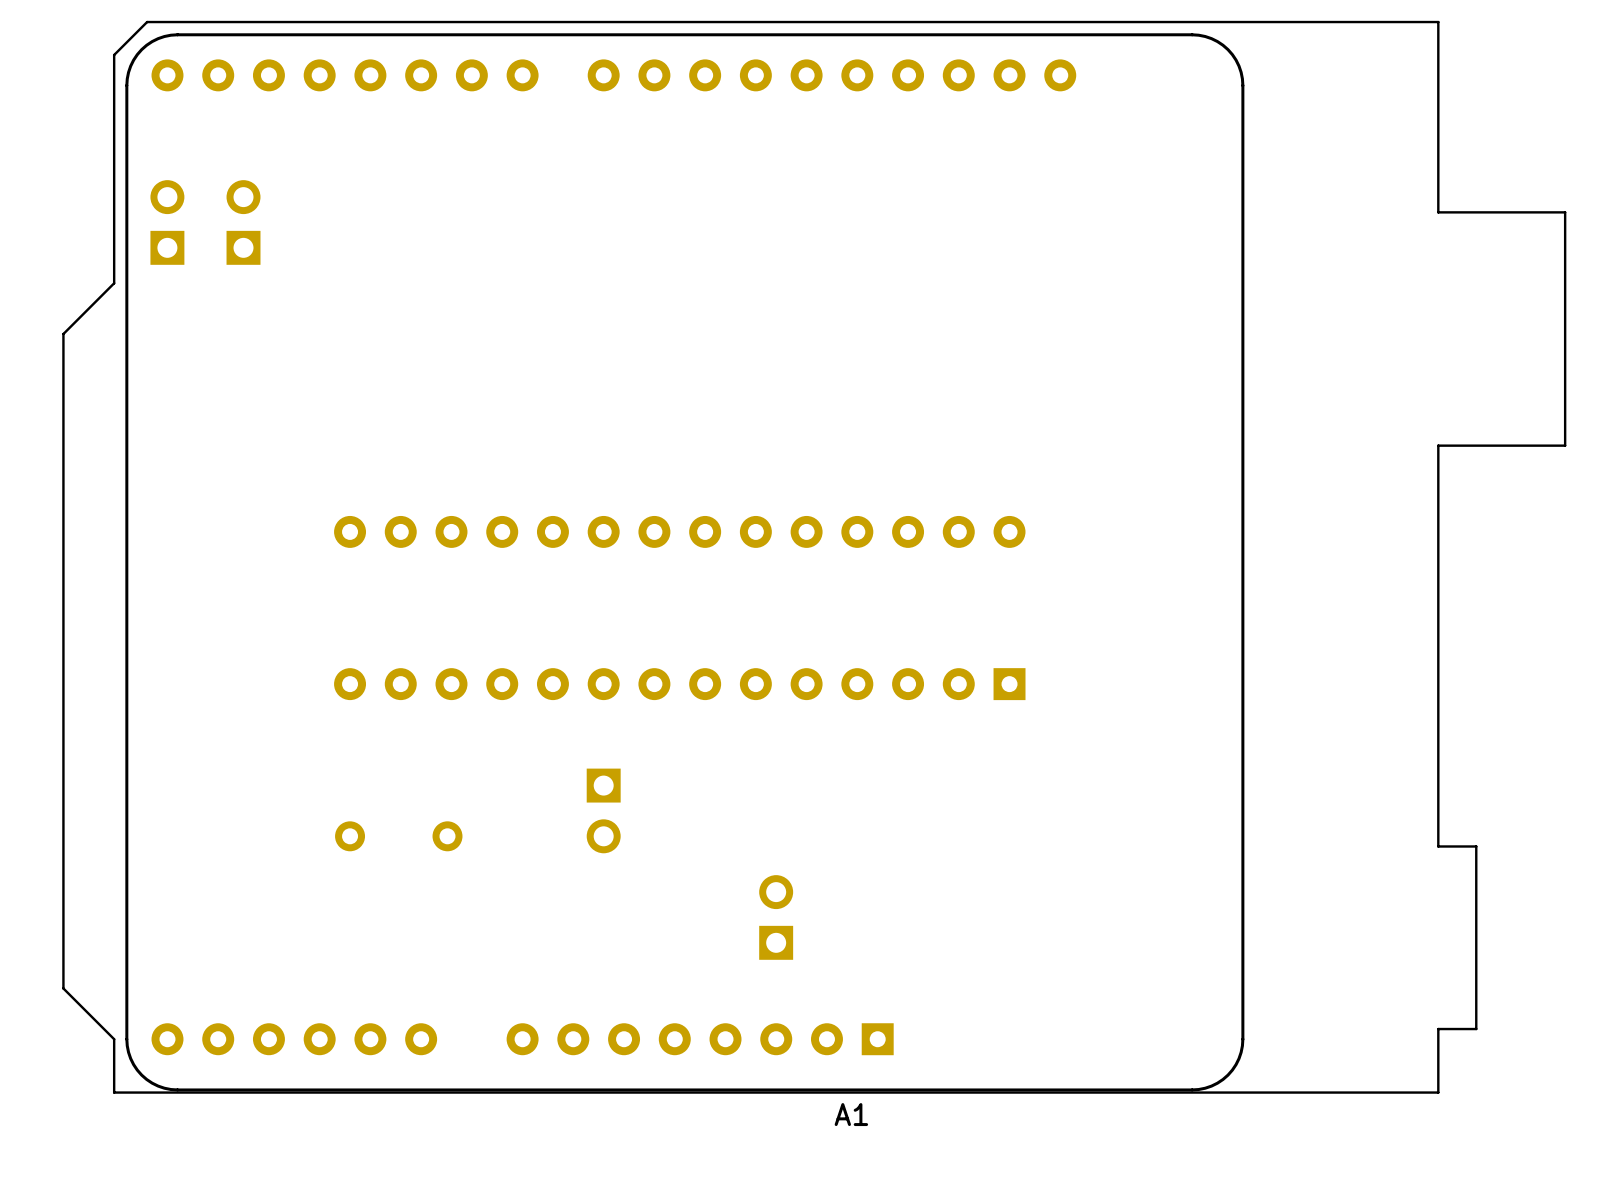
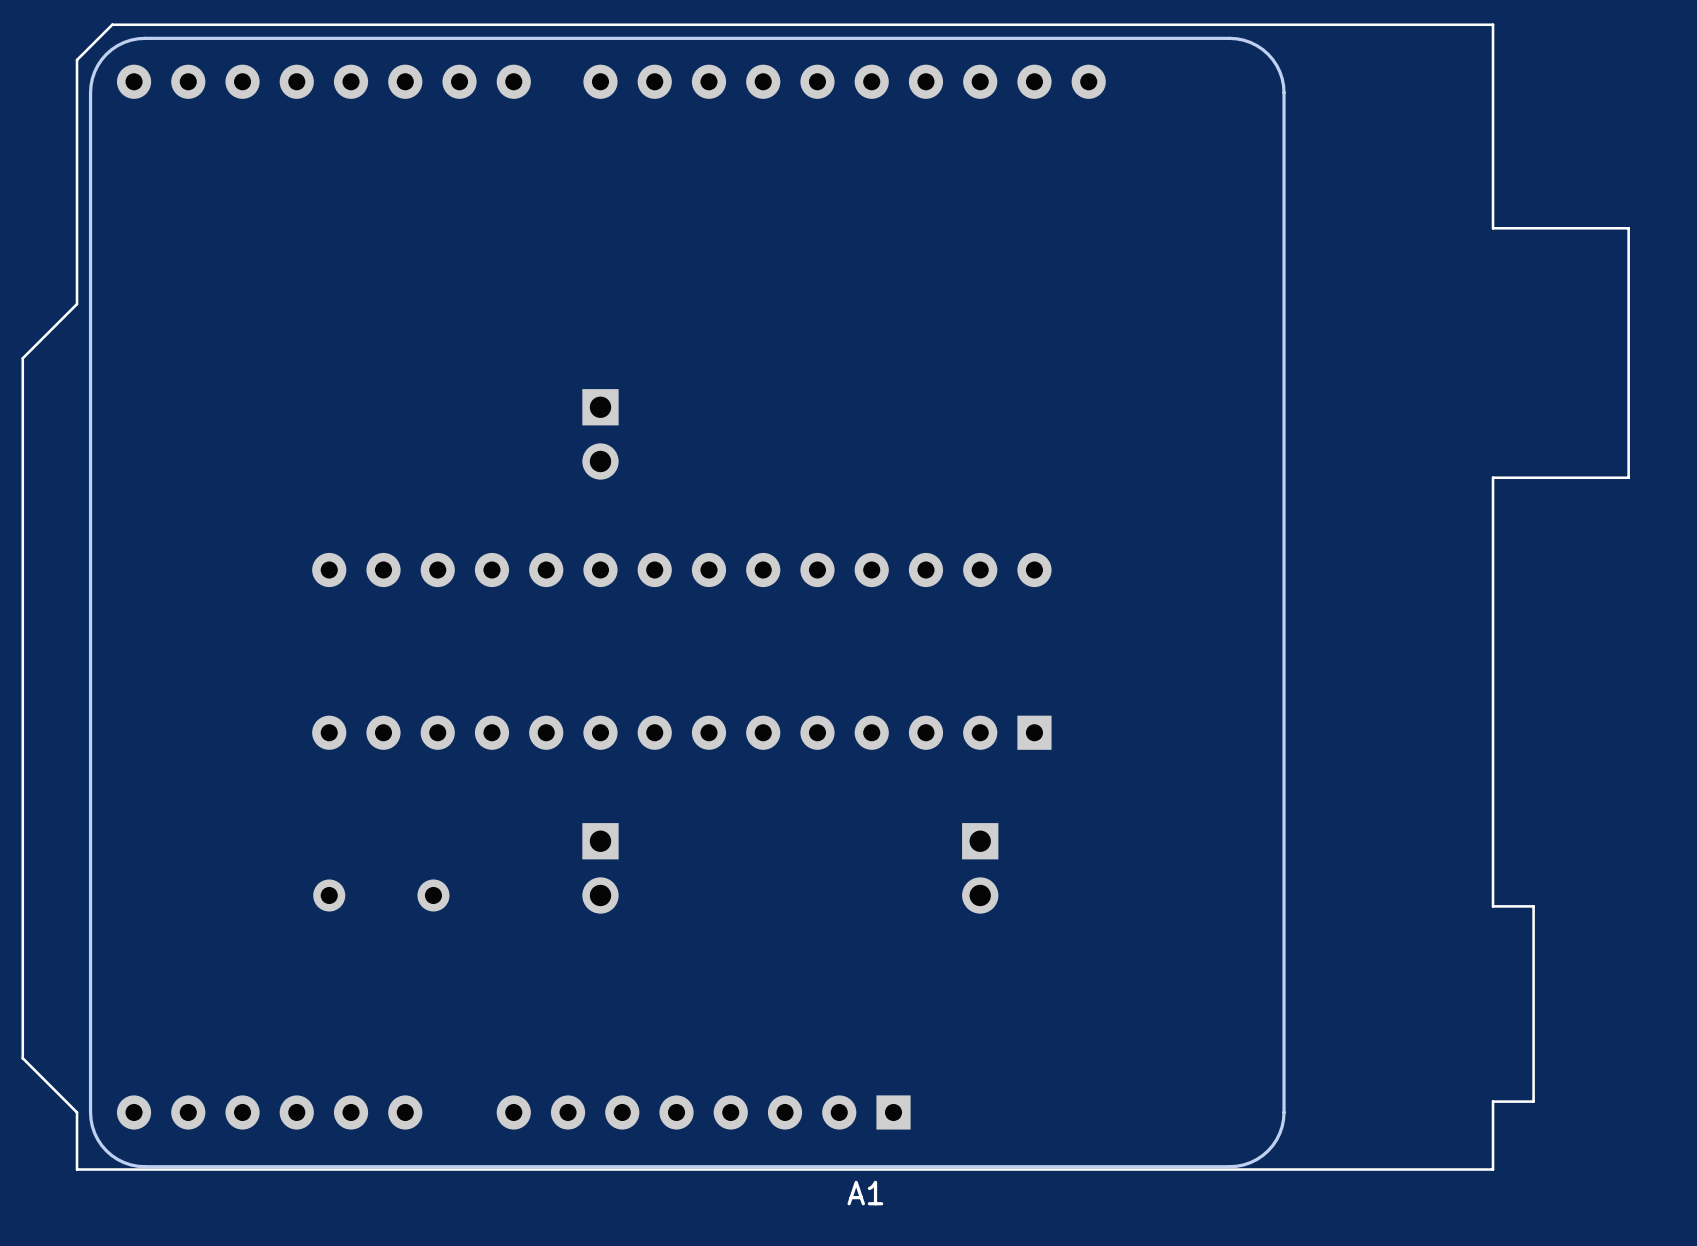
part: (167, 222) -> none
part: (243, 222) -> none
part: none -> (600, 434)
part rotation: 0° (776, 917) -> 180° (980, 868)
part position: (776, 917) -> (980, 868)

